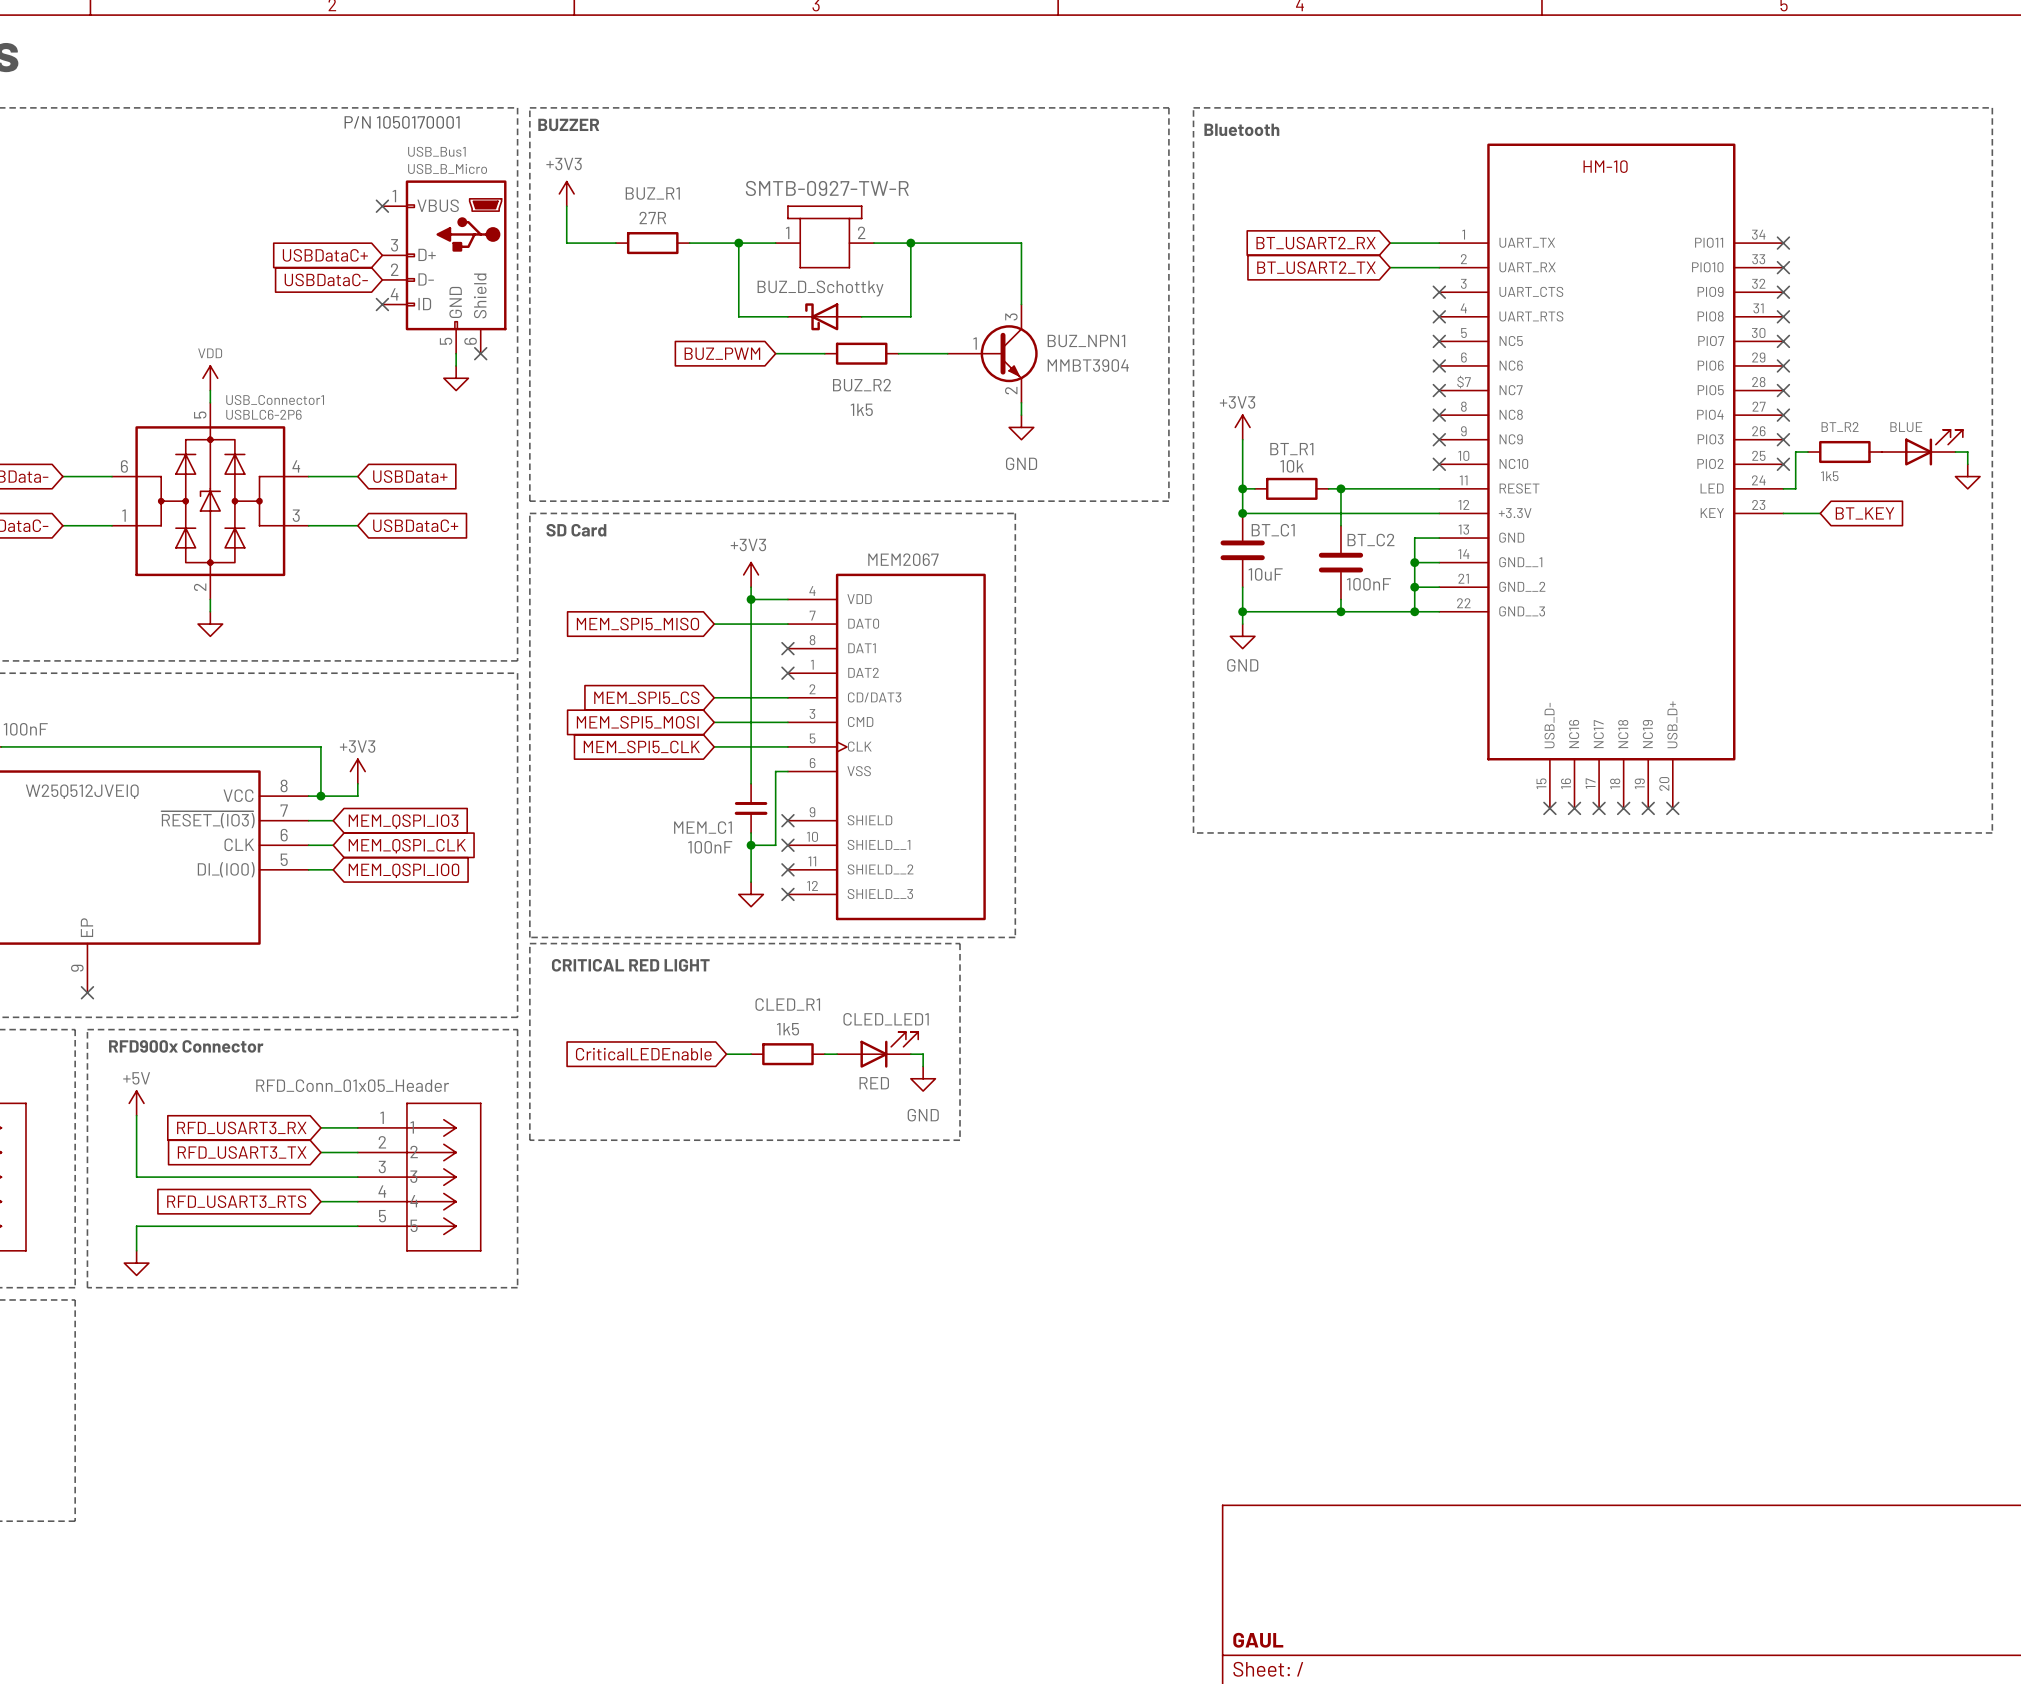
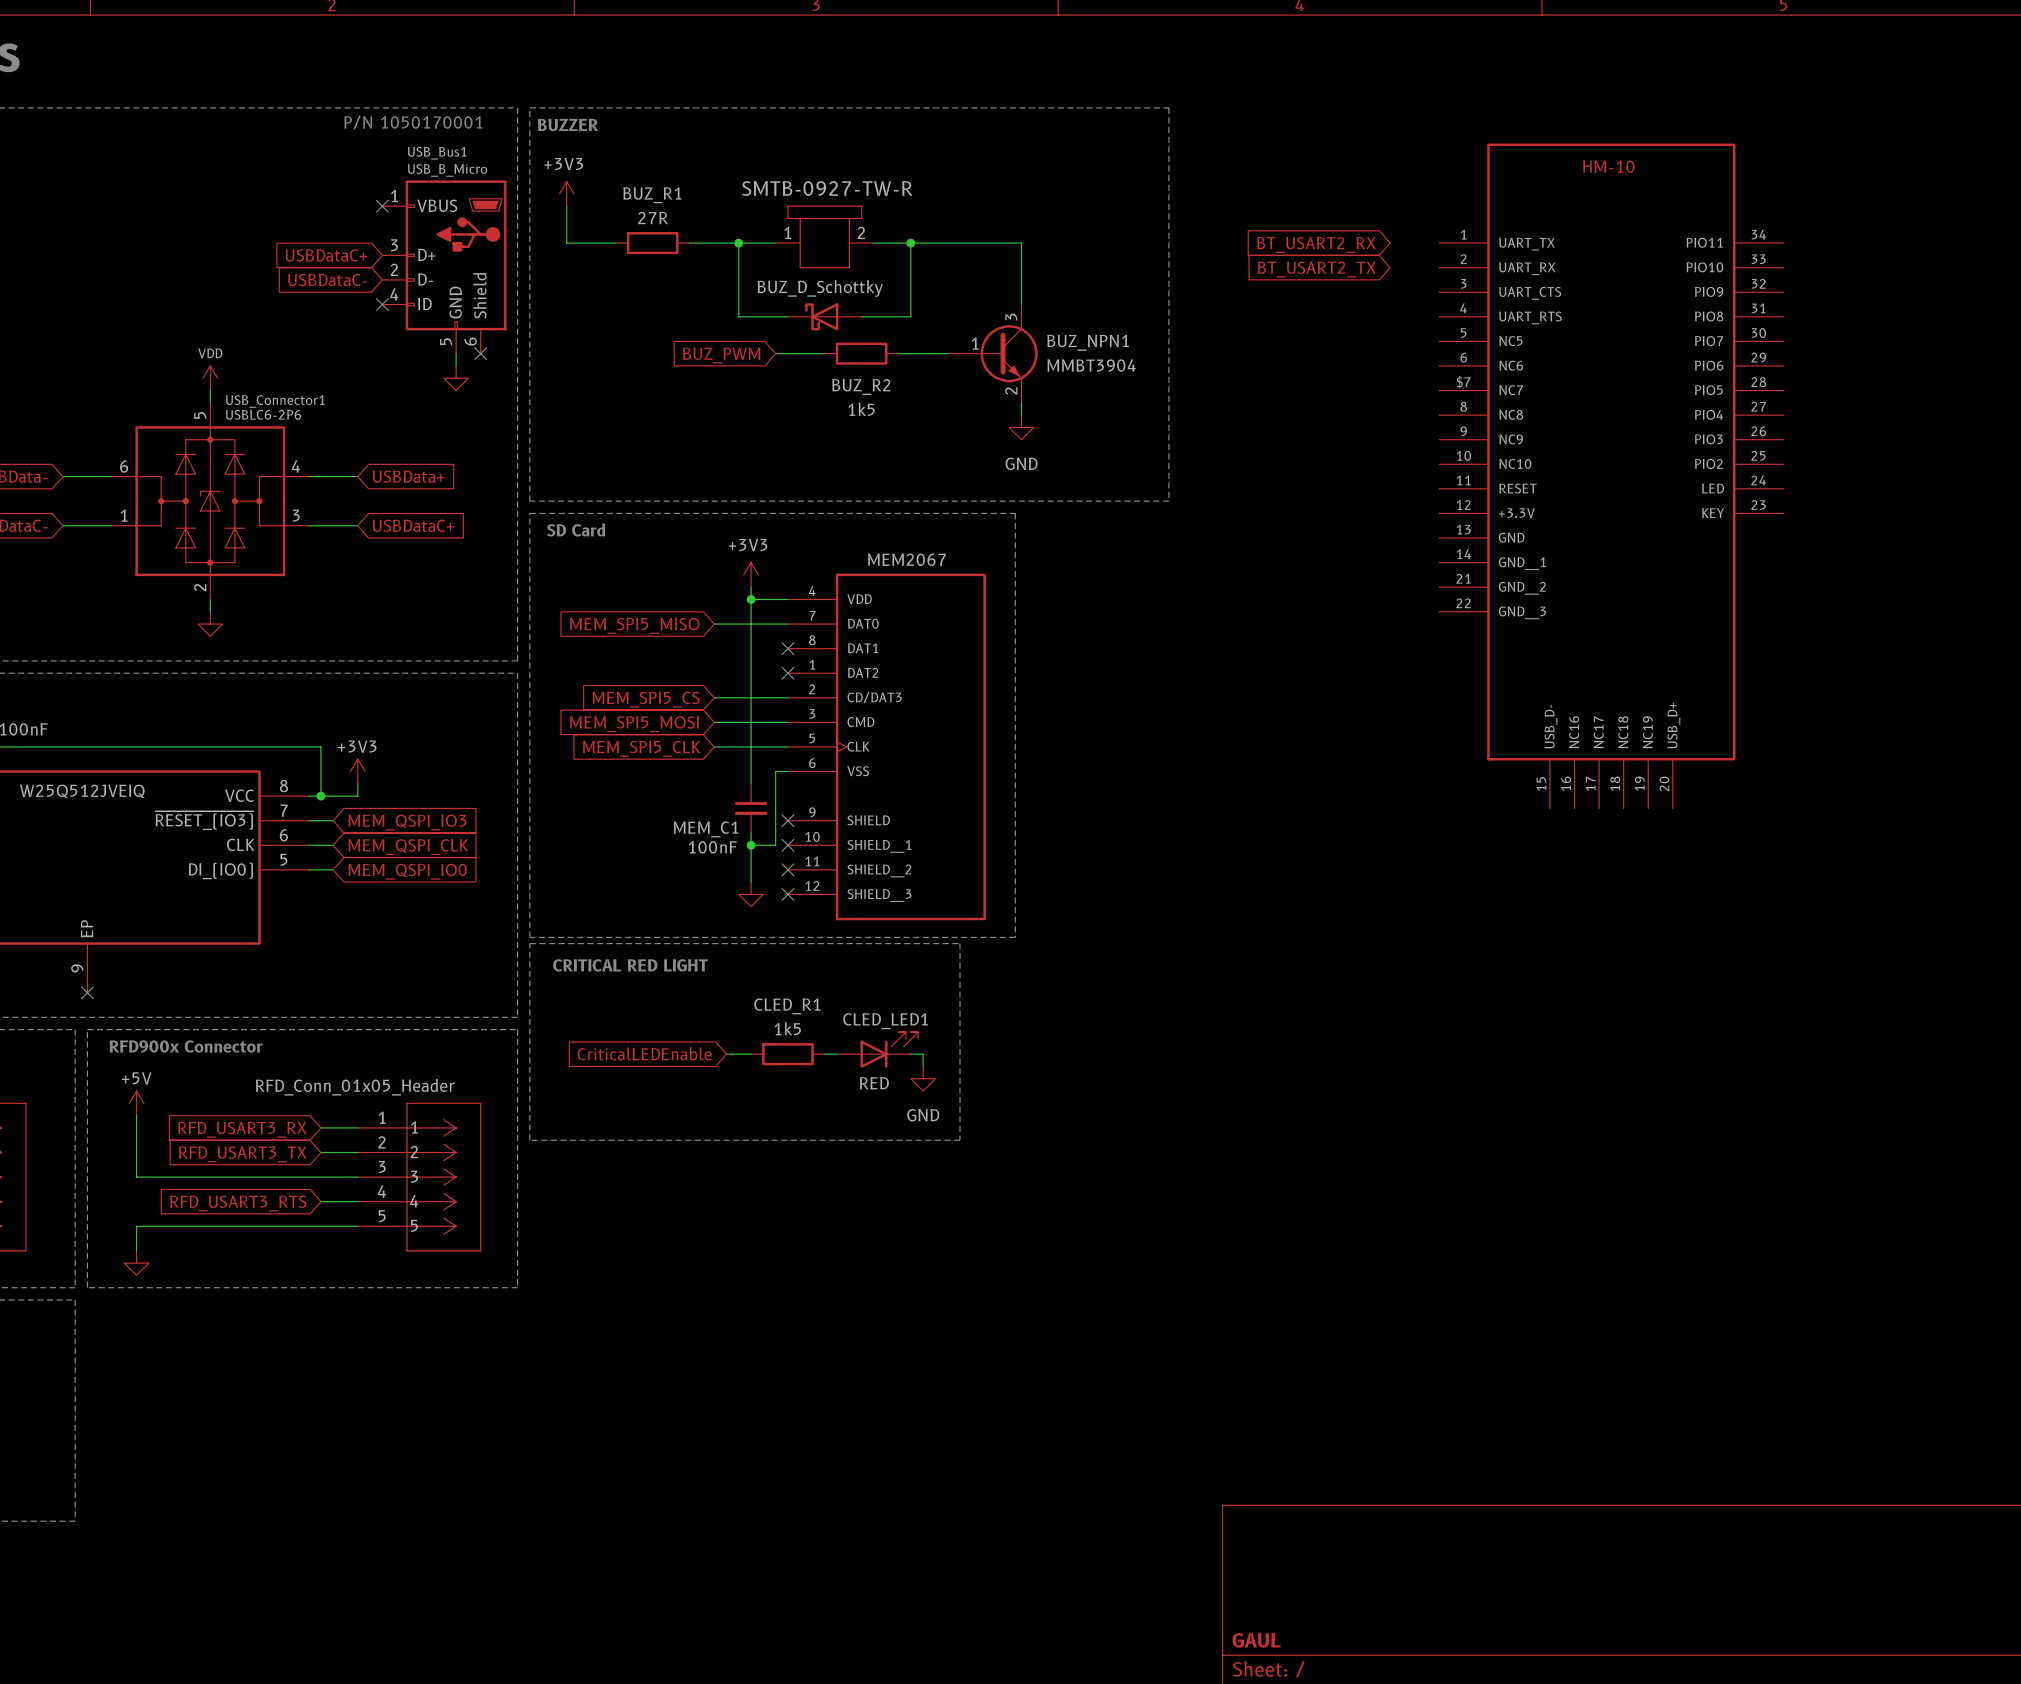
line: (1193, 107) (1992, 107) (1992, 832) (1193, 832) (1193, 107) -> none
text: Bluetooth (1241, 129) -> none
wire: (1390, 243) (1439, 243) -> none
no-connect mark: (1783, 243) -> none
wire: (1390, 267) (1439, 267) -> none
no-connect mark: (1783, 267) -> none
no-connect mark: (1439, 292) -> none
no-connect mark: (1783, 292) -> none
no-connect mark: (1439, 316) -> none
no-connect mark: (1783, 316) -> none
no-connect mark: (1439, 341) -> none
no-connect mark: (1783, 341) -> none
no-connect mark: (1439, 365) -> none
no-connect mark: (1783, 365) -> none
no-connect mark: (1439, 390) -> none
no-connect mark: (1783, 390) -> none
no-connect mark: (1439, 415) -> none
no-connect mark: (1783, 415) -> none
power symbol: +3V3 (1242, 427) -> none
wire: (1242, 439) (1242, 513) (1439, 513) -> none
no-connect mark: (1439, 439) -> none
no-connect mark: (1783, 439) -> none
part: BLUE (1922, 447) -> none
wire: (1807, 452) (1795, 452) (1795, 488) (1783, 488) -> none
BT_R2: 1k5 (1844, 452) -> none
wire: (1955, 452) (1967, 452) (1967, 464) -> none
no-connect mark: (1439, 464) -> none
no-connect mark: (1783, 464) -> none
power symbol: (1967, 476) -> none
wire: (1242, 488) (1254, 488) -> none
junction: (1242, 488) -> none
BT_R1: 10k (1291, 488) -> none
wire: (1328, 488) (1439, 488) -> none
wire: (1340, 488) (1340, 525) -> none
junction: (1340, 488) -> none
junction: (1242, 513) -> none
wire: (1783, 513) (1820, 513) -> none
global label: BT_KEY (1865, 513) -> none
wire: (1439, 538) (1414, 538) (1414, 611) -> none
BT_C1: 10uF (1242, 550) -> none
BT_C2: 100nF (1340, 562) -> none
wire: (1414, 562) (1439, 562) -> none
junction: (1414, 562) -> none
wire: (1242, 587) (1242, 624) -> none
wire: (1414, 587) (1439, 587) -> none
junction: (1414, 587) -> none
wire: (1340, 599) (1340, 611) -> none
wire: (1242, 611) (1439, 611) -> none
junction: (1242, 611) -> none
junction: (1340, 611) -> none
junction: (1414, 611) -> none
power symbol: GND (1242, 636) -> none
no-connect mark: (1549, 808) -> none
no-connect mark: (1574, 808) -> none
no-connect mark: (1599, 808) -> none
no-connect mark: (1623, 808) -> none
no-connect mark: (1648, 808) -> none
no-connect mark: (1672, 808) -> none

